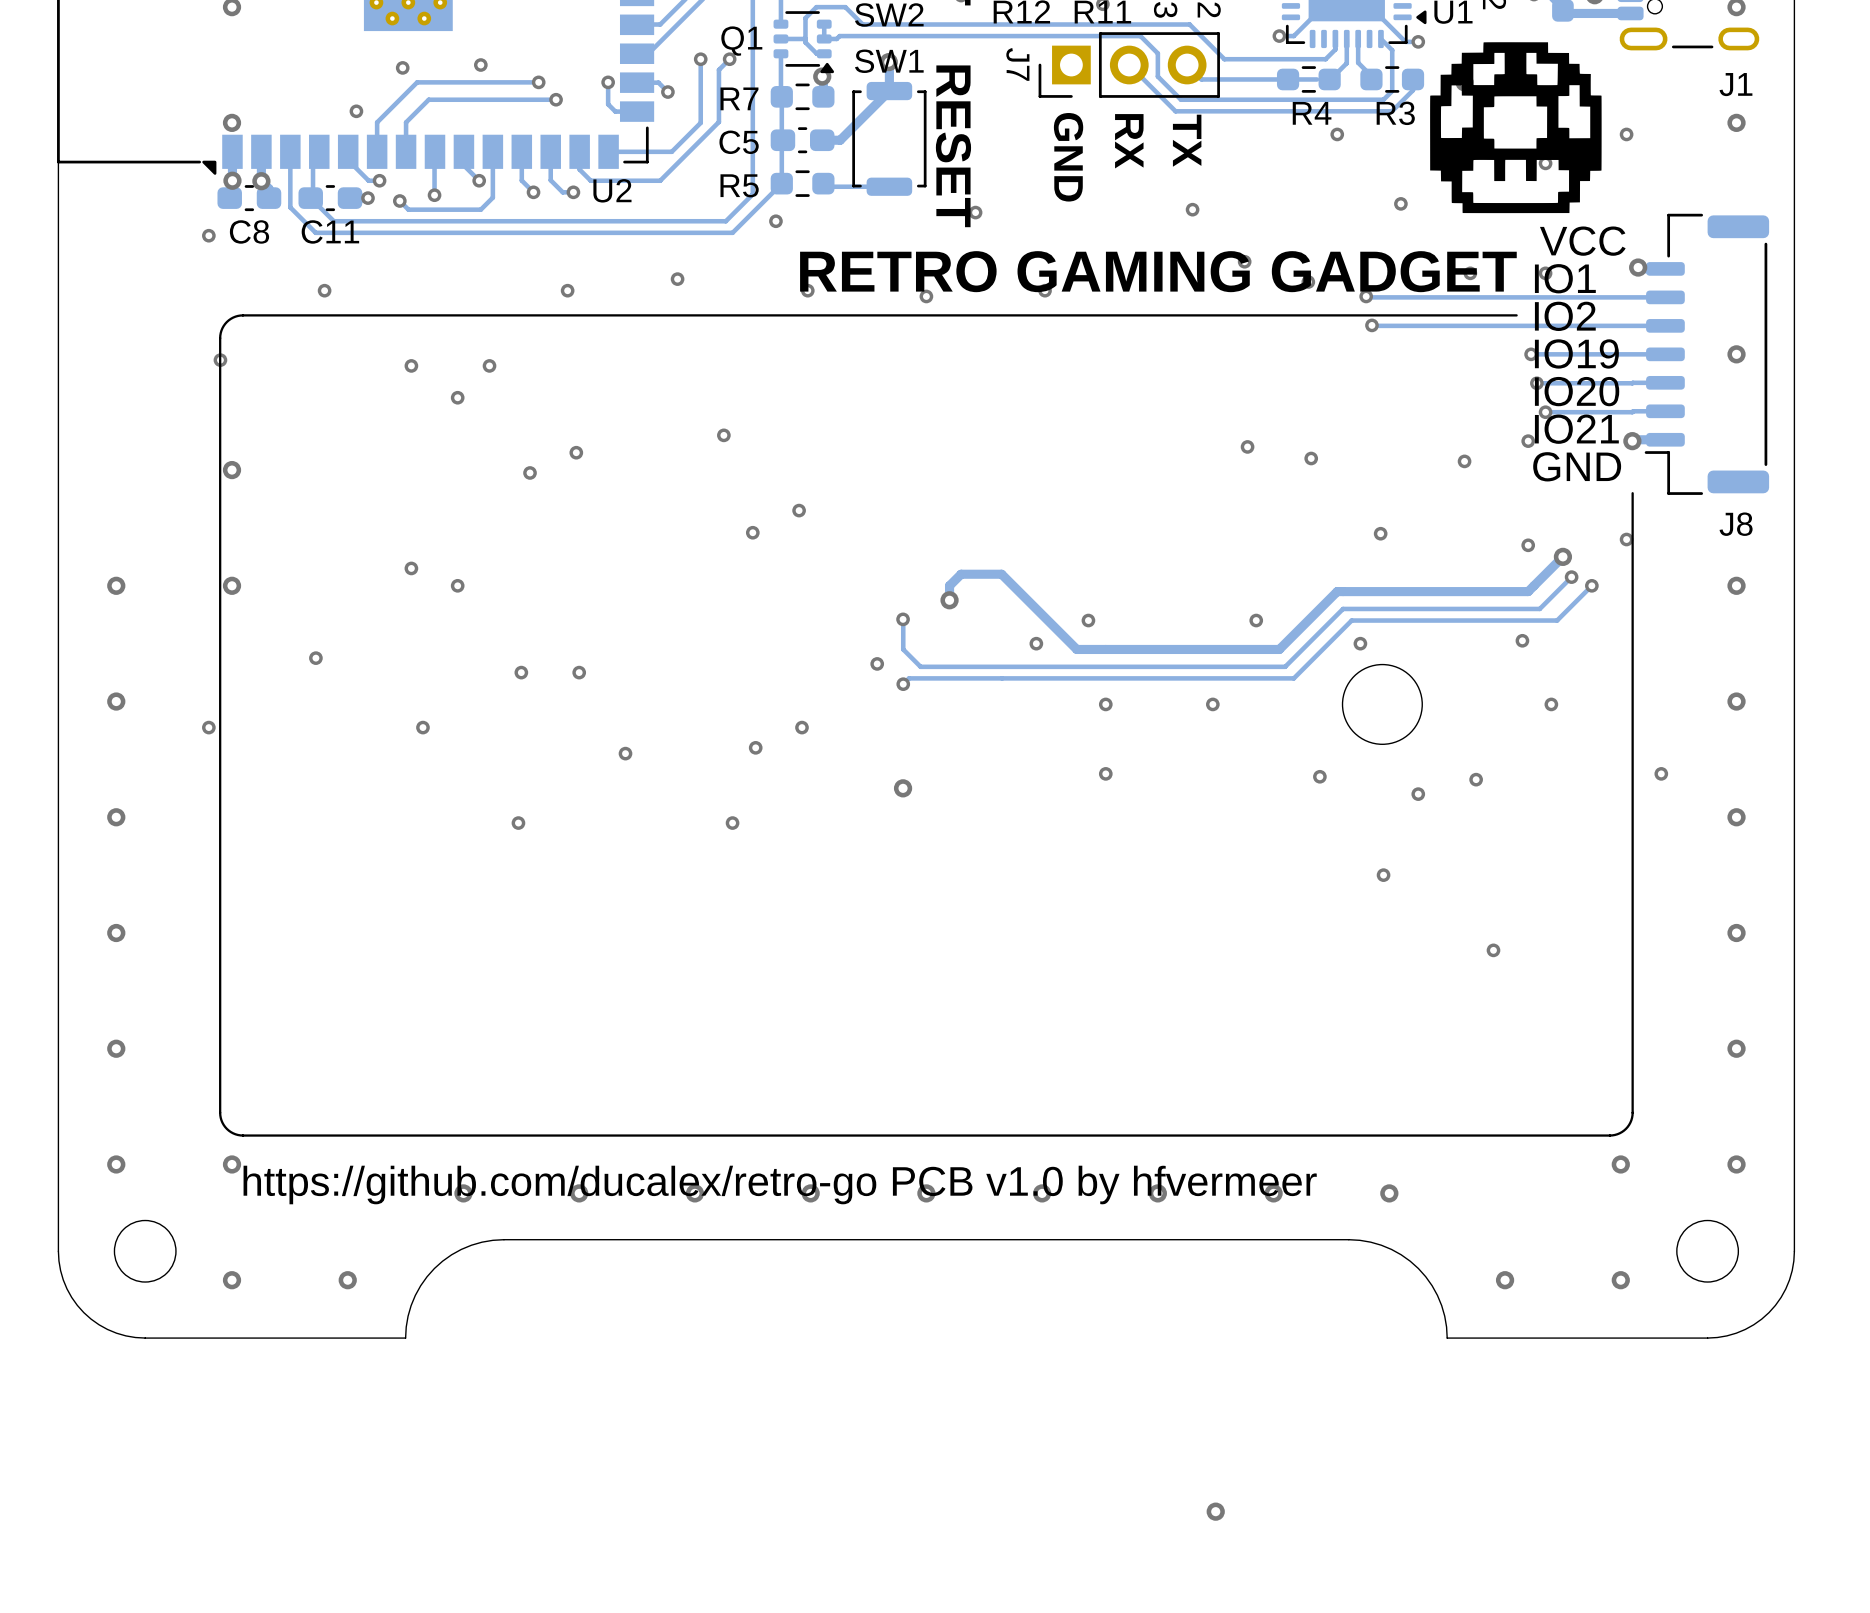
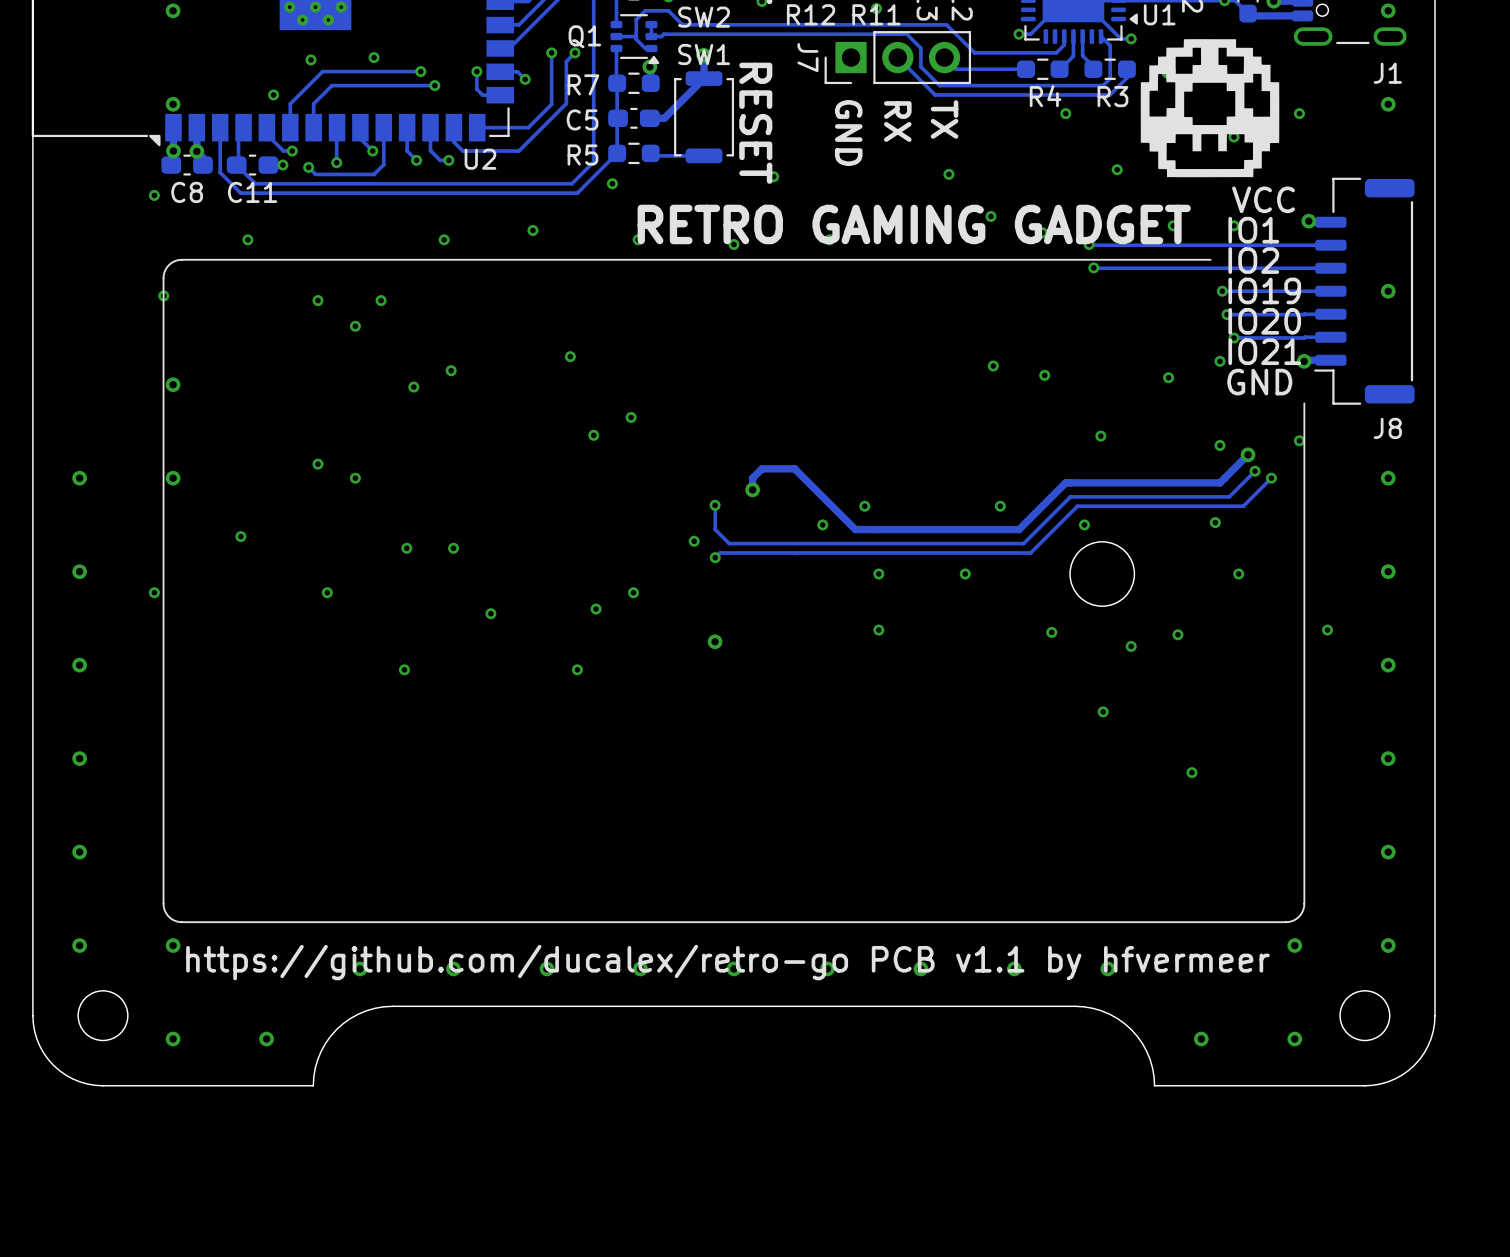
track: (1317, 79) (1288, 79) -> none
text: https://github.com/ducalex/retro-go PCB v1.0 by hfvermeer (780, 1185) -> https://github.com/ducalex/retro-go PCB v1.1 by hfvermeer (727, 962)
via: (1215, 1511) -> none

